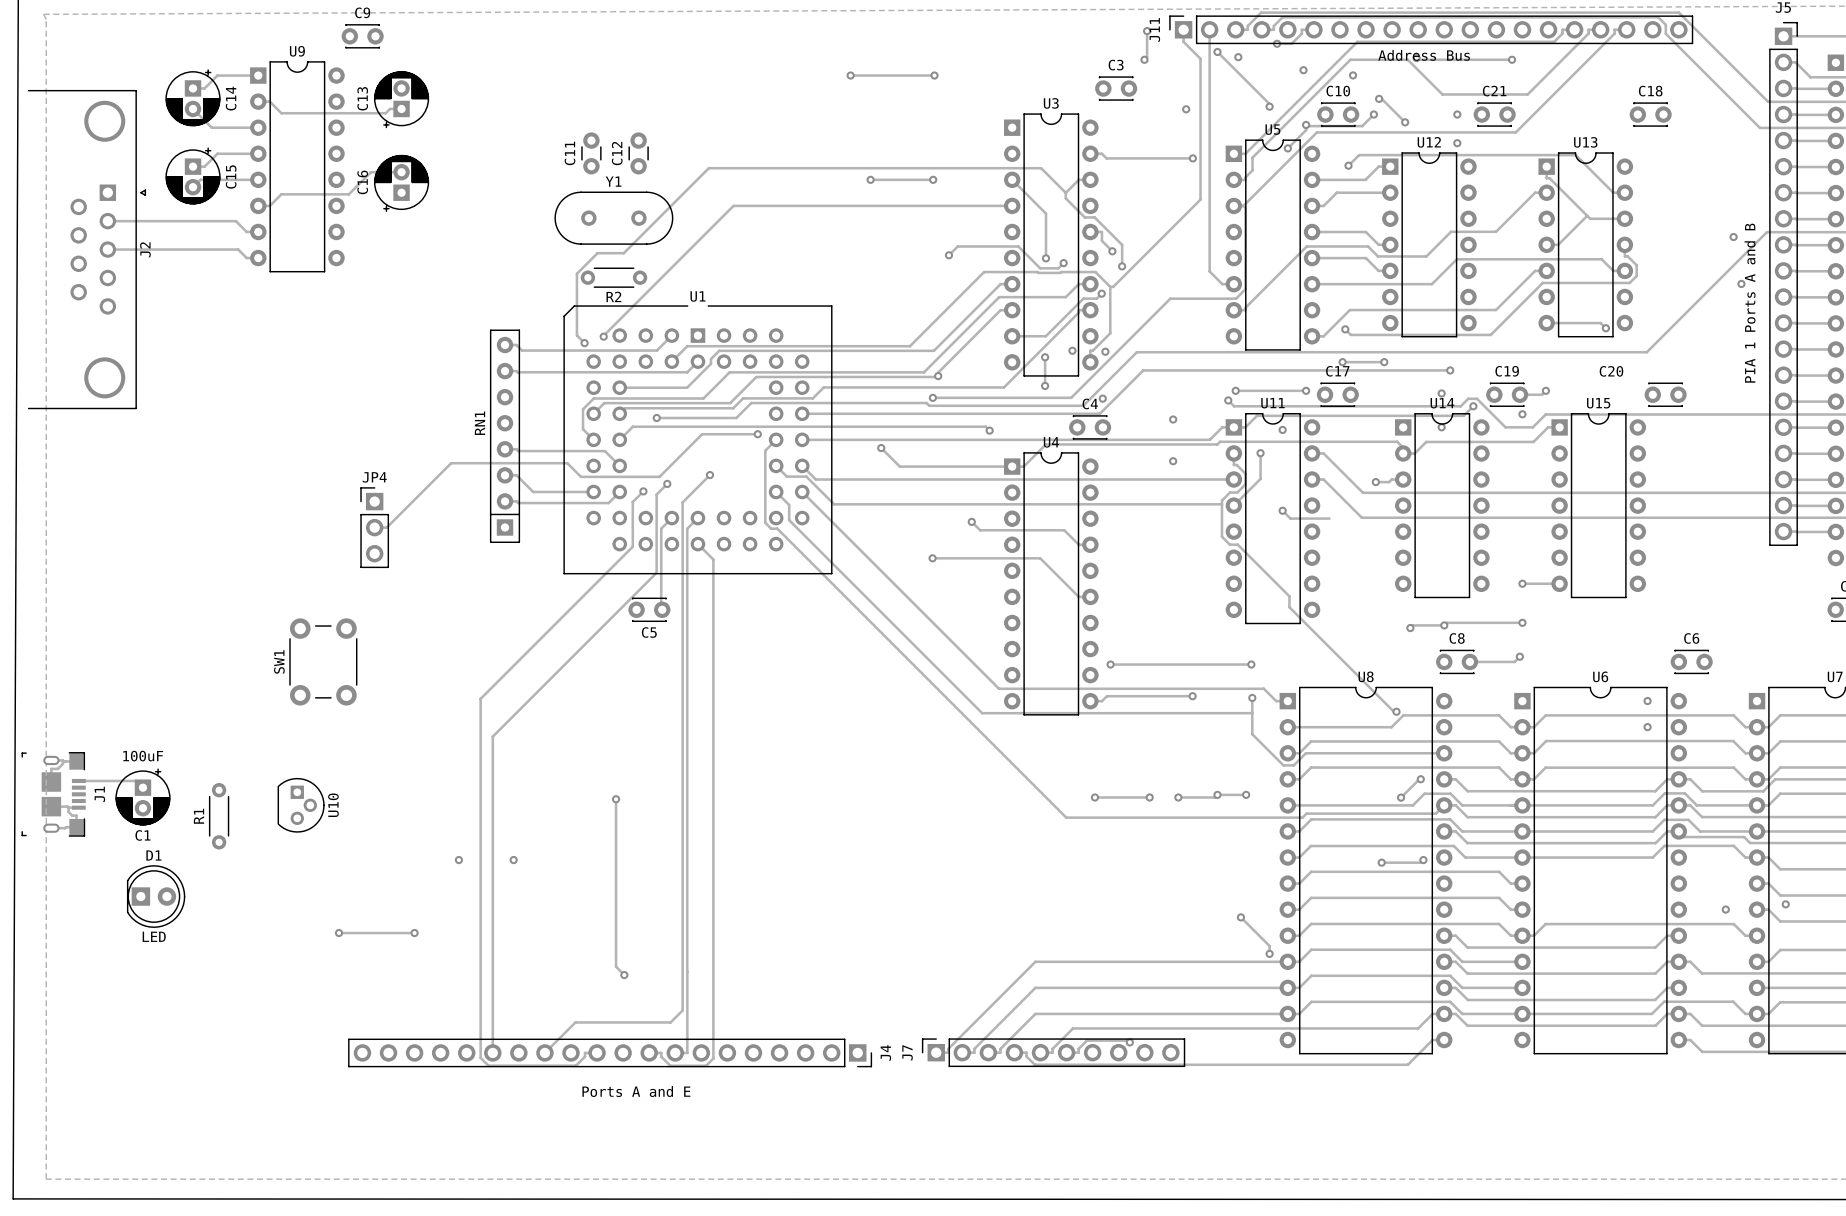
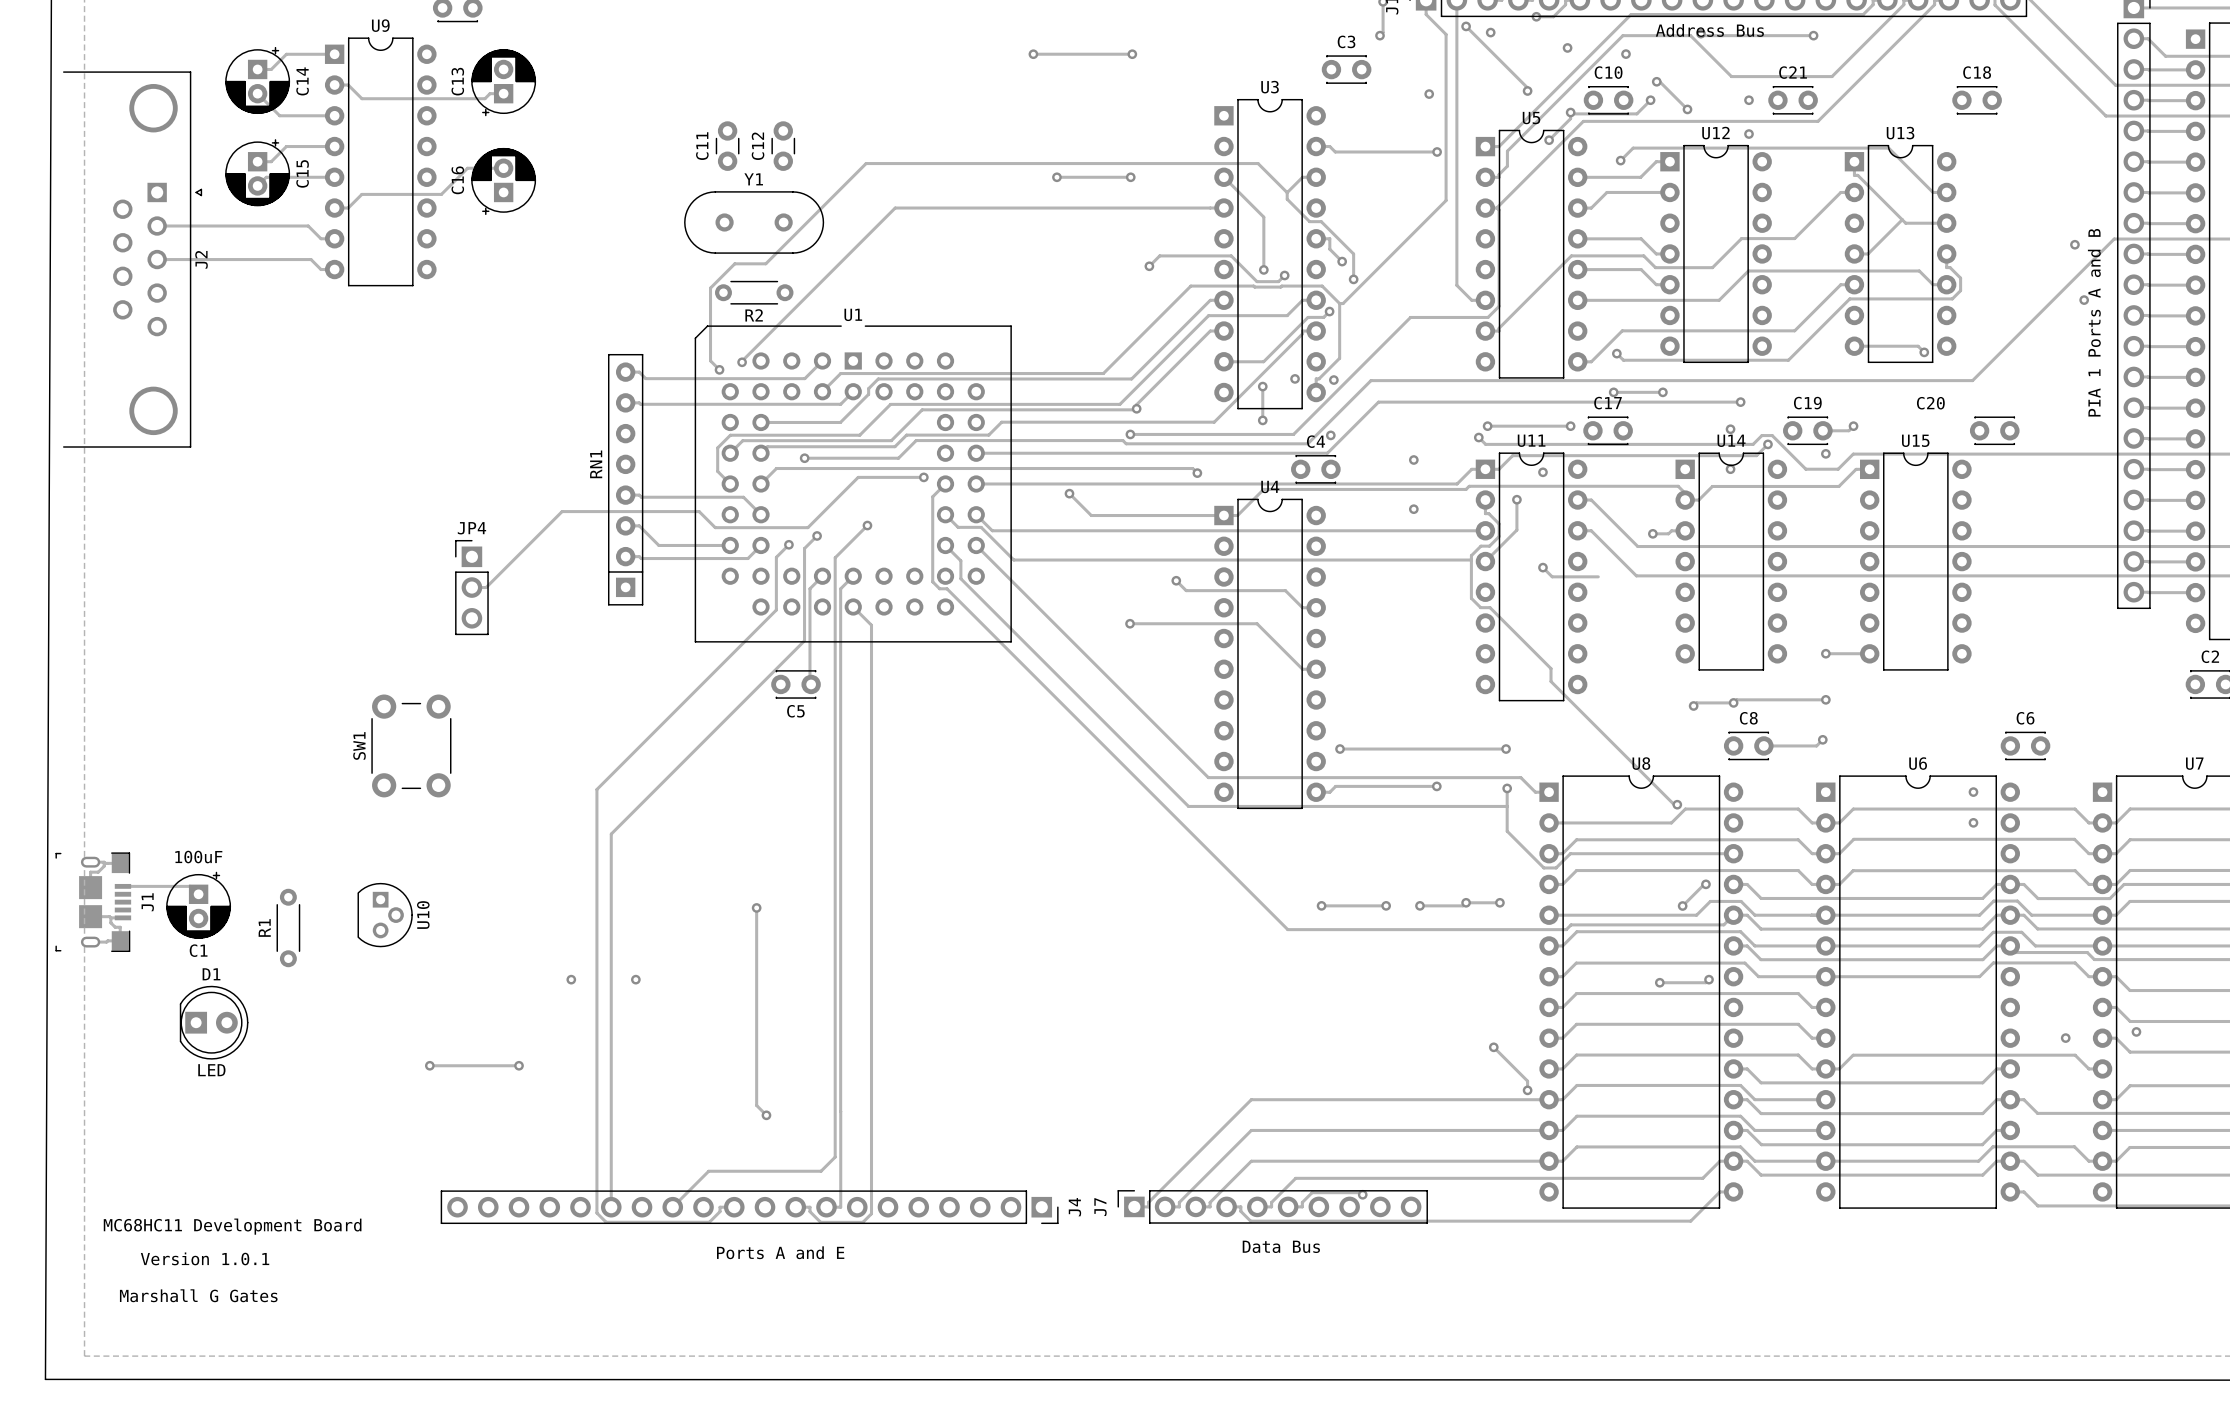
text: none -> MC68HC11 Development Board (232, 1226)
J7 value: none -> Data Bus (1281, 1246)
text: none -> Version 1.0.1 (205, 1258)
text: none -> Marshall G Gates (198, 1295)

